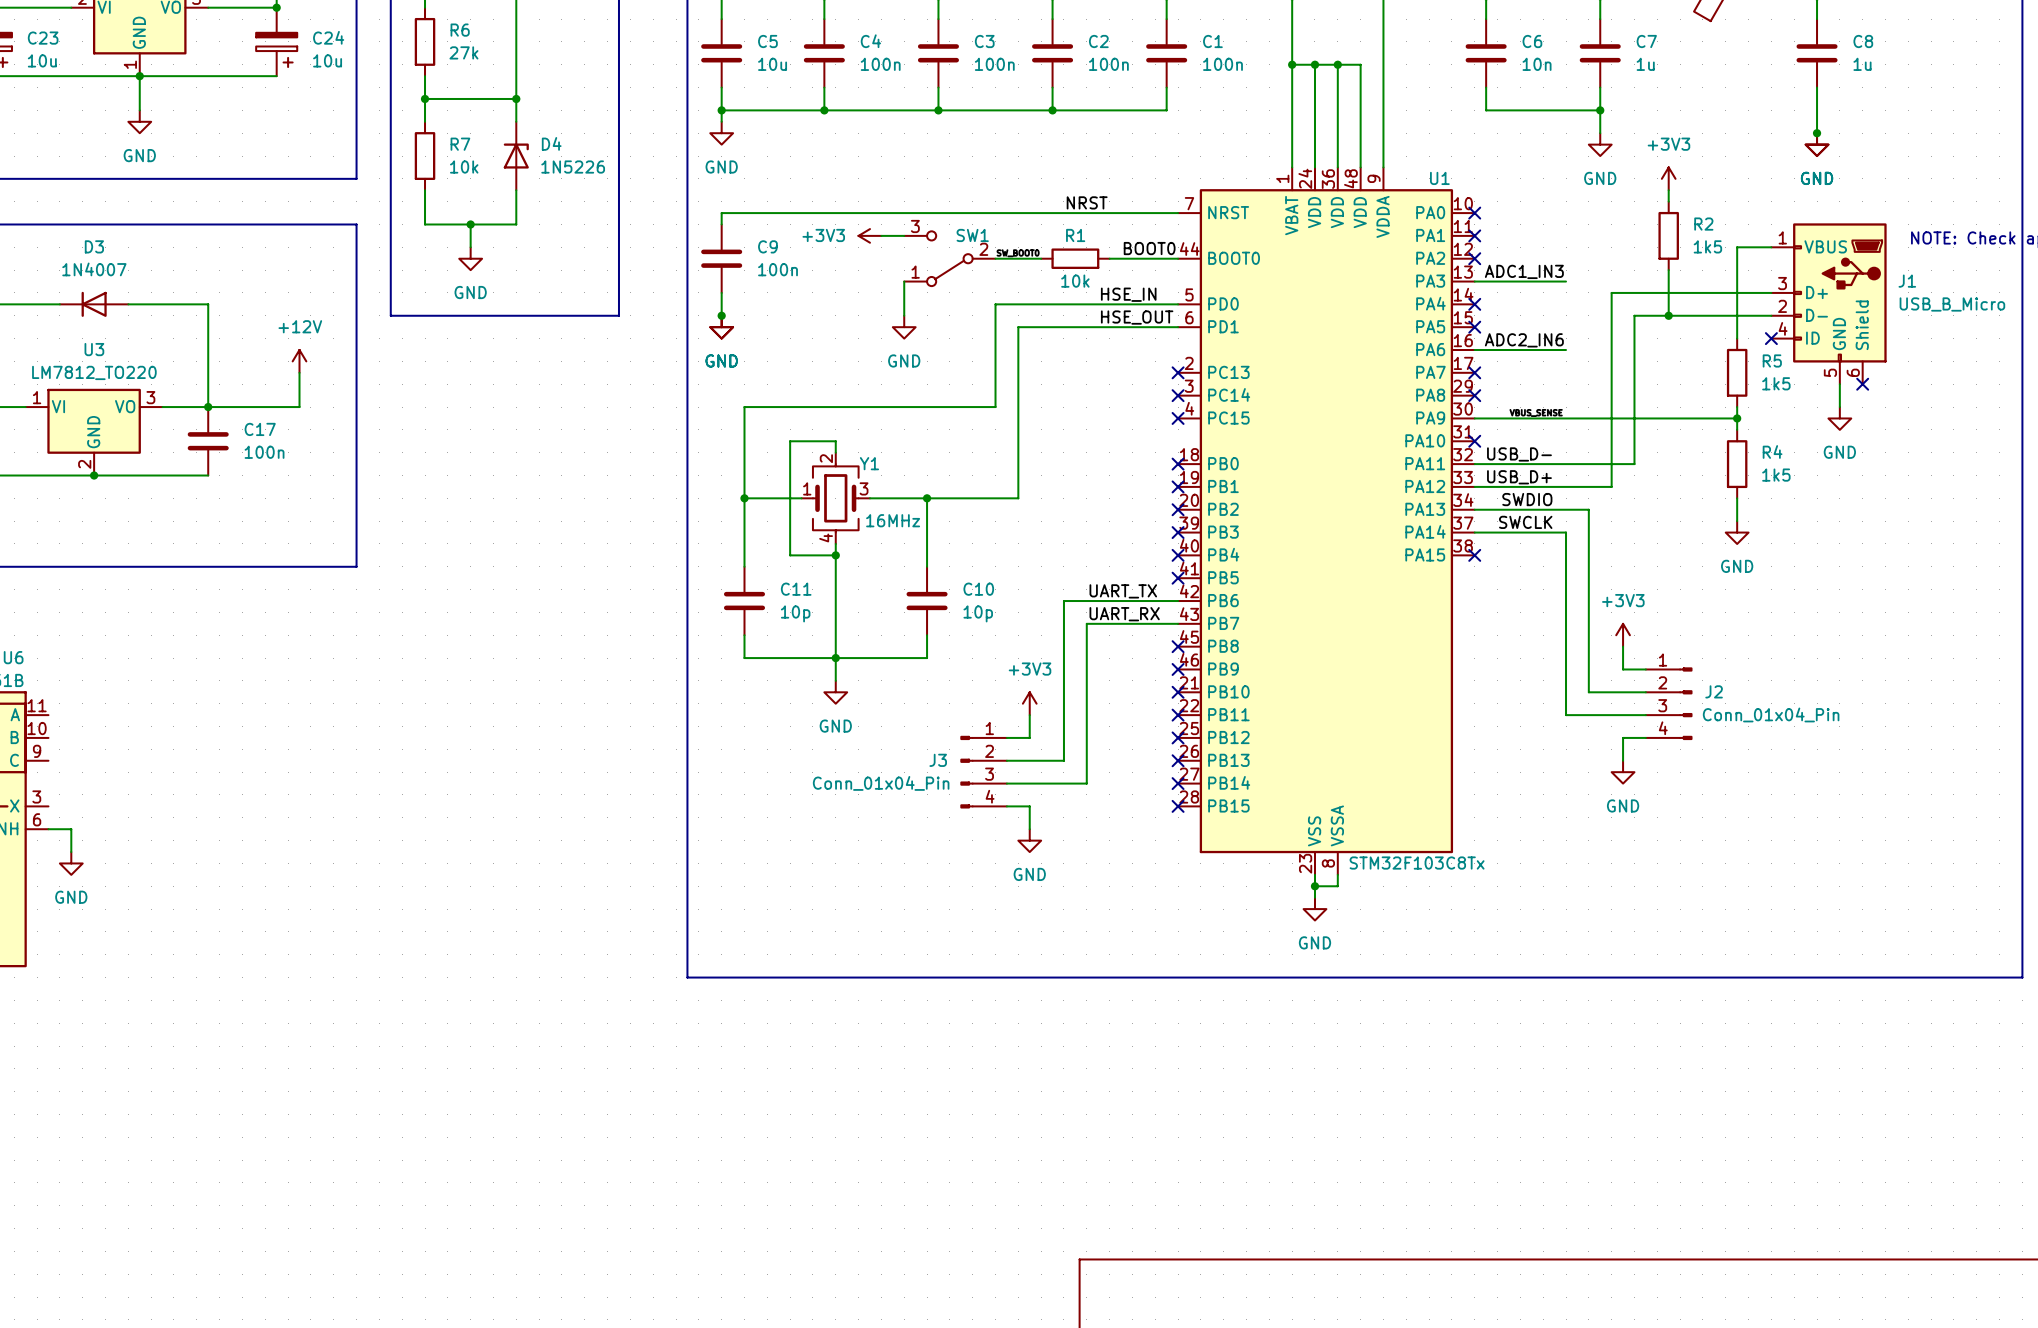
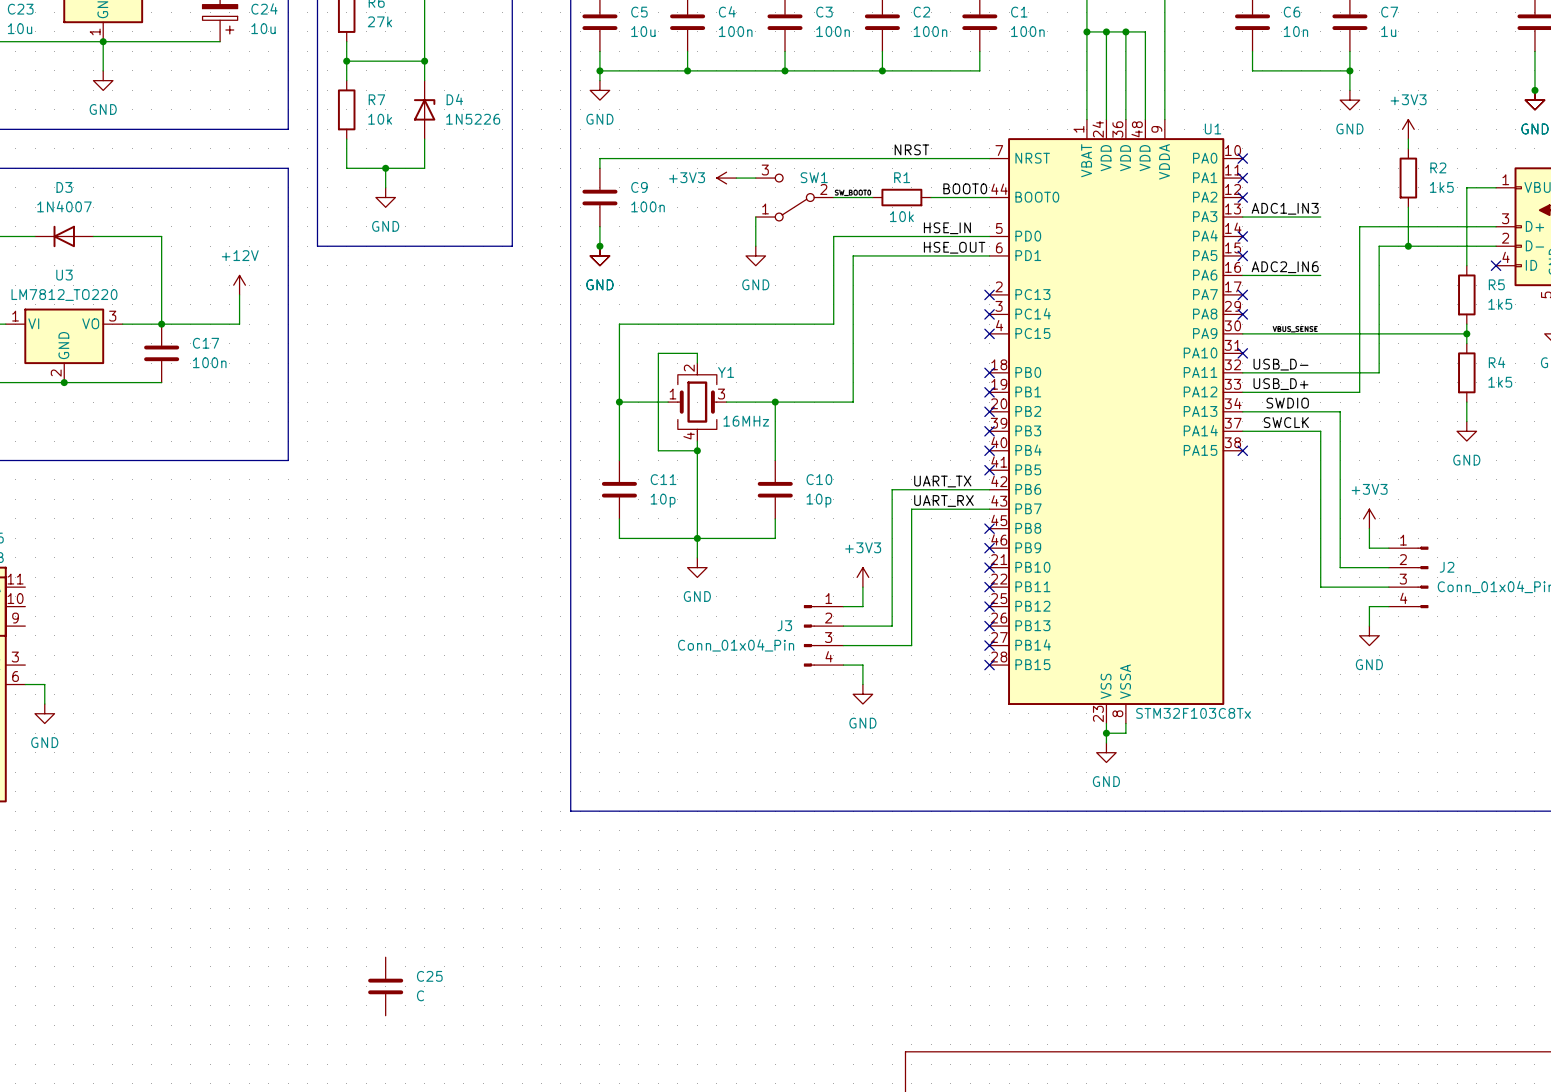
C25: none -> C (385, 986)

